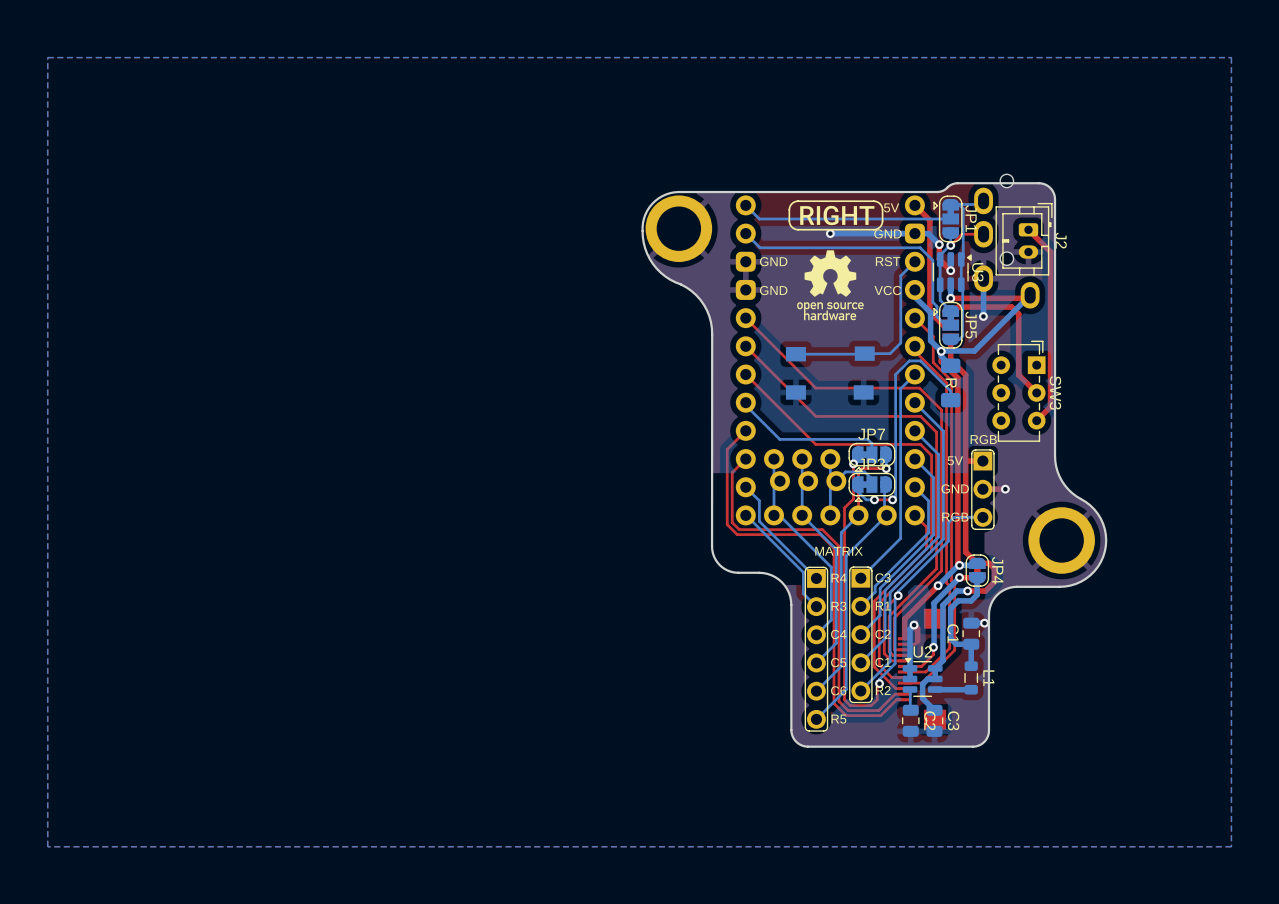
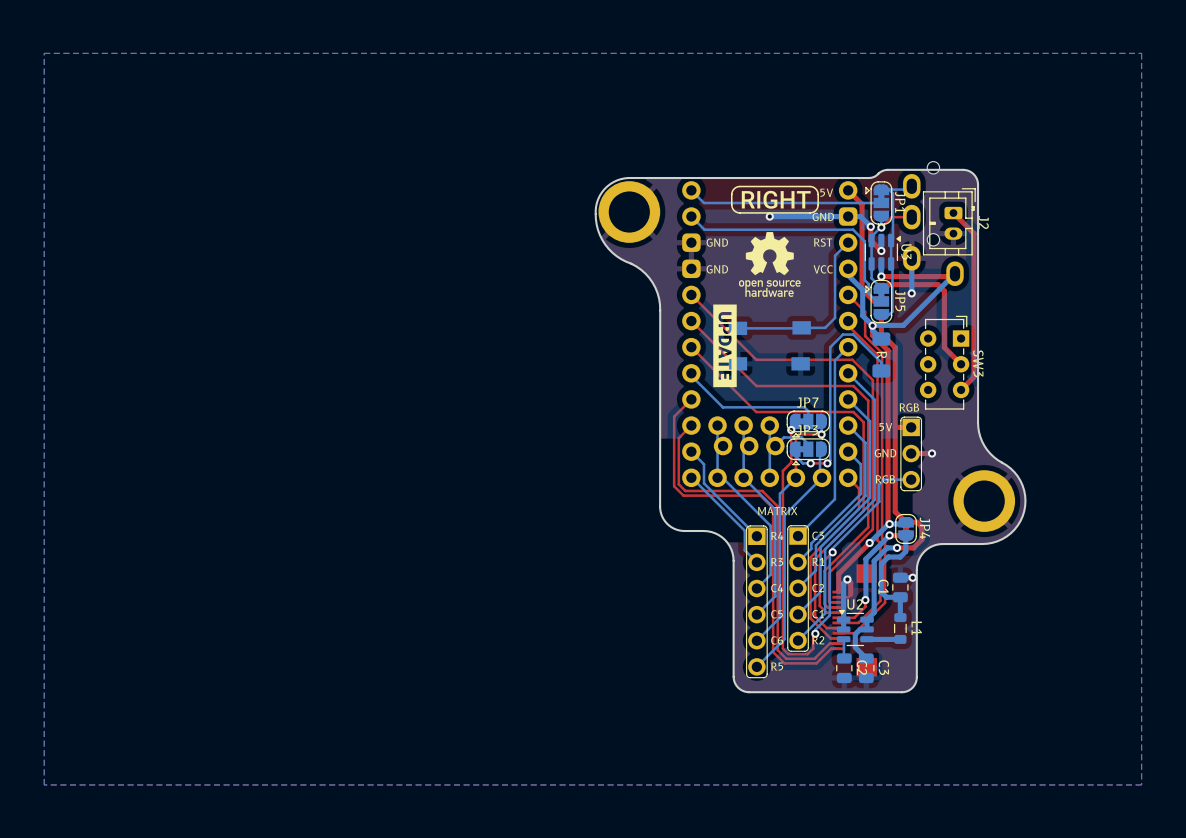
drawing: none -> [713, 304, 737, 388]

